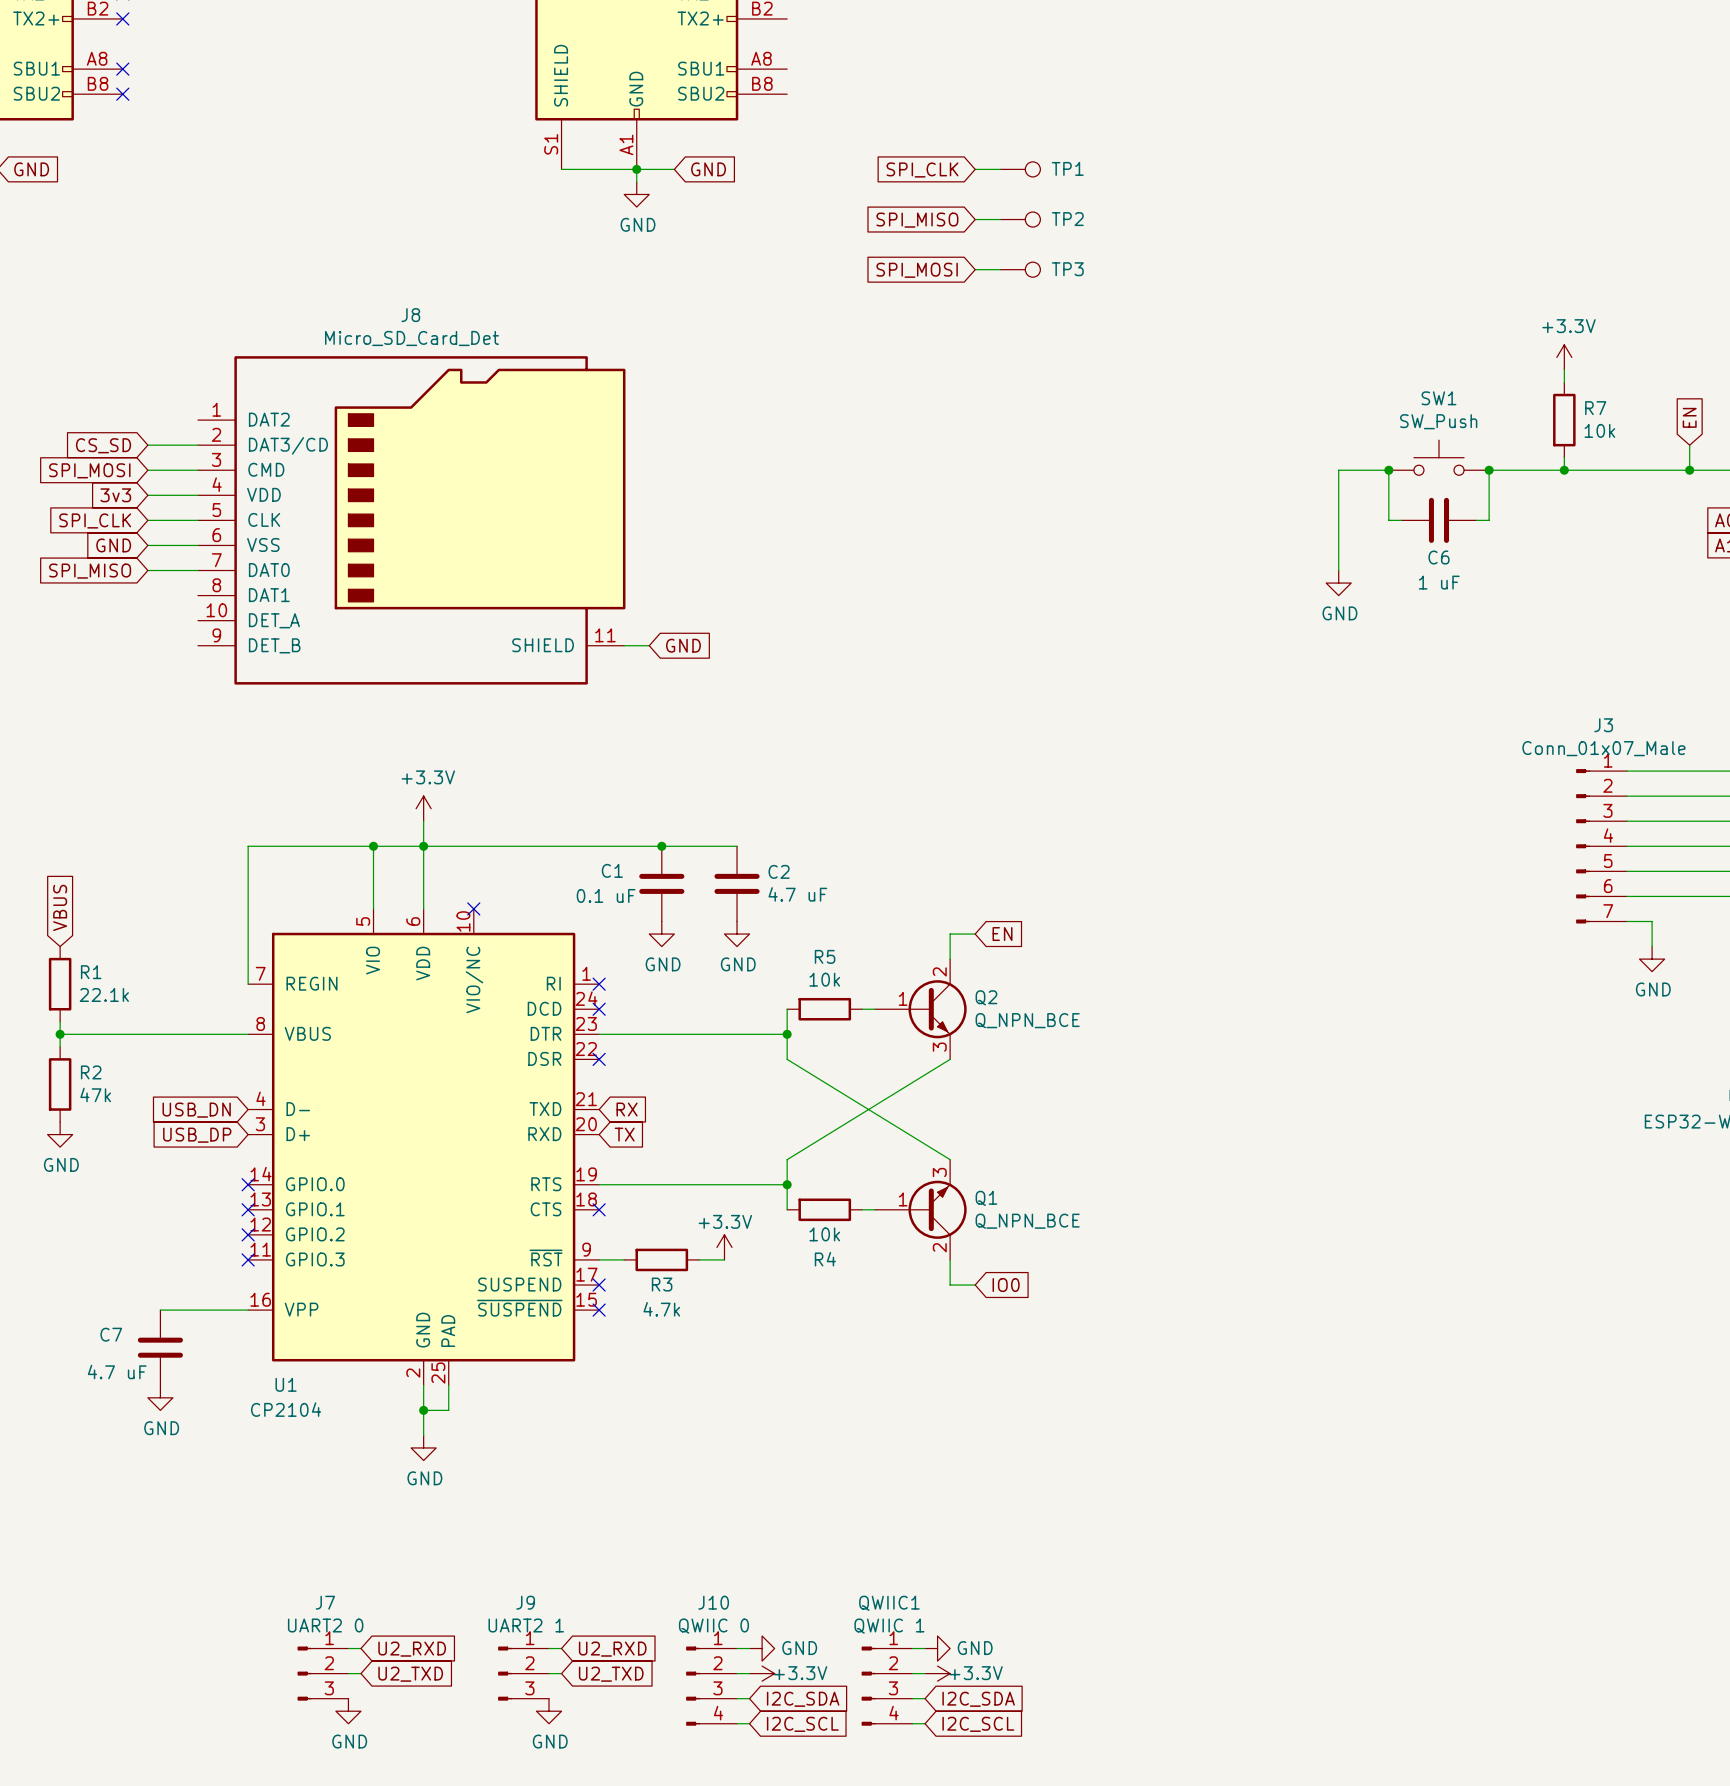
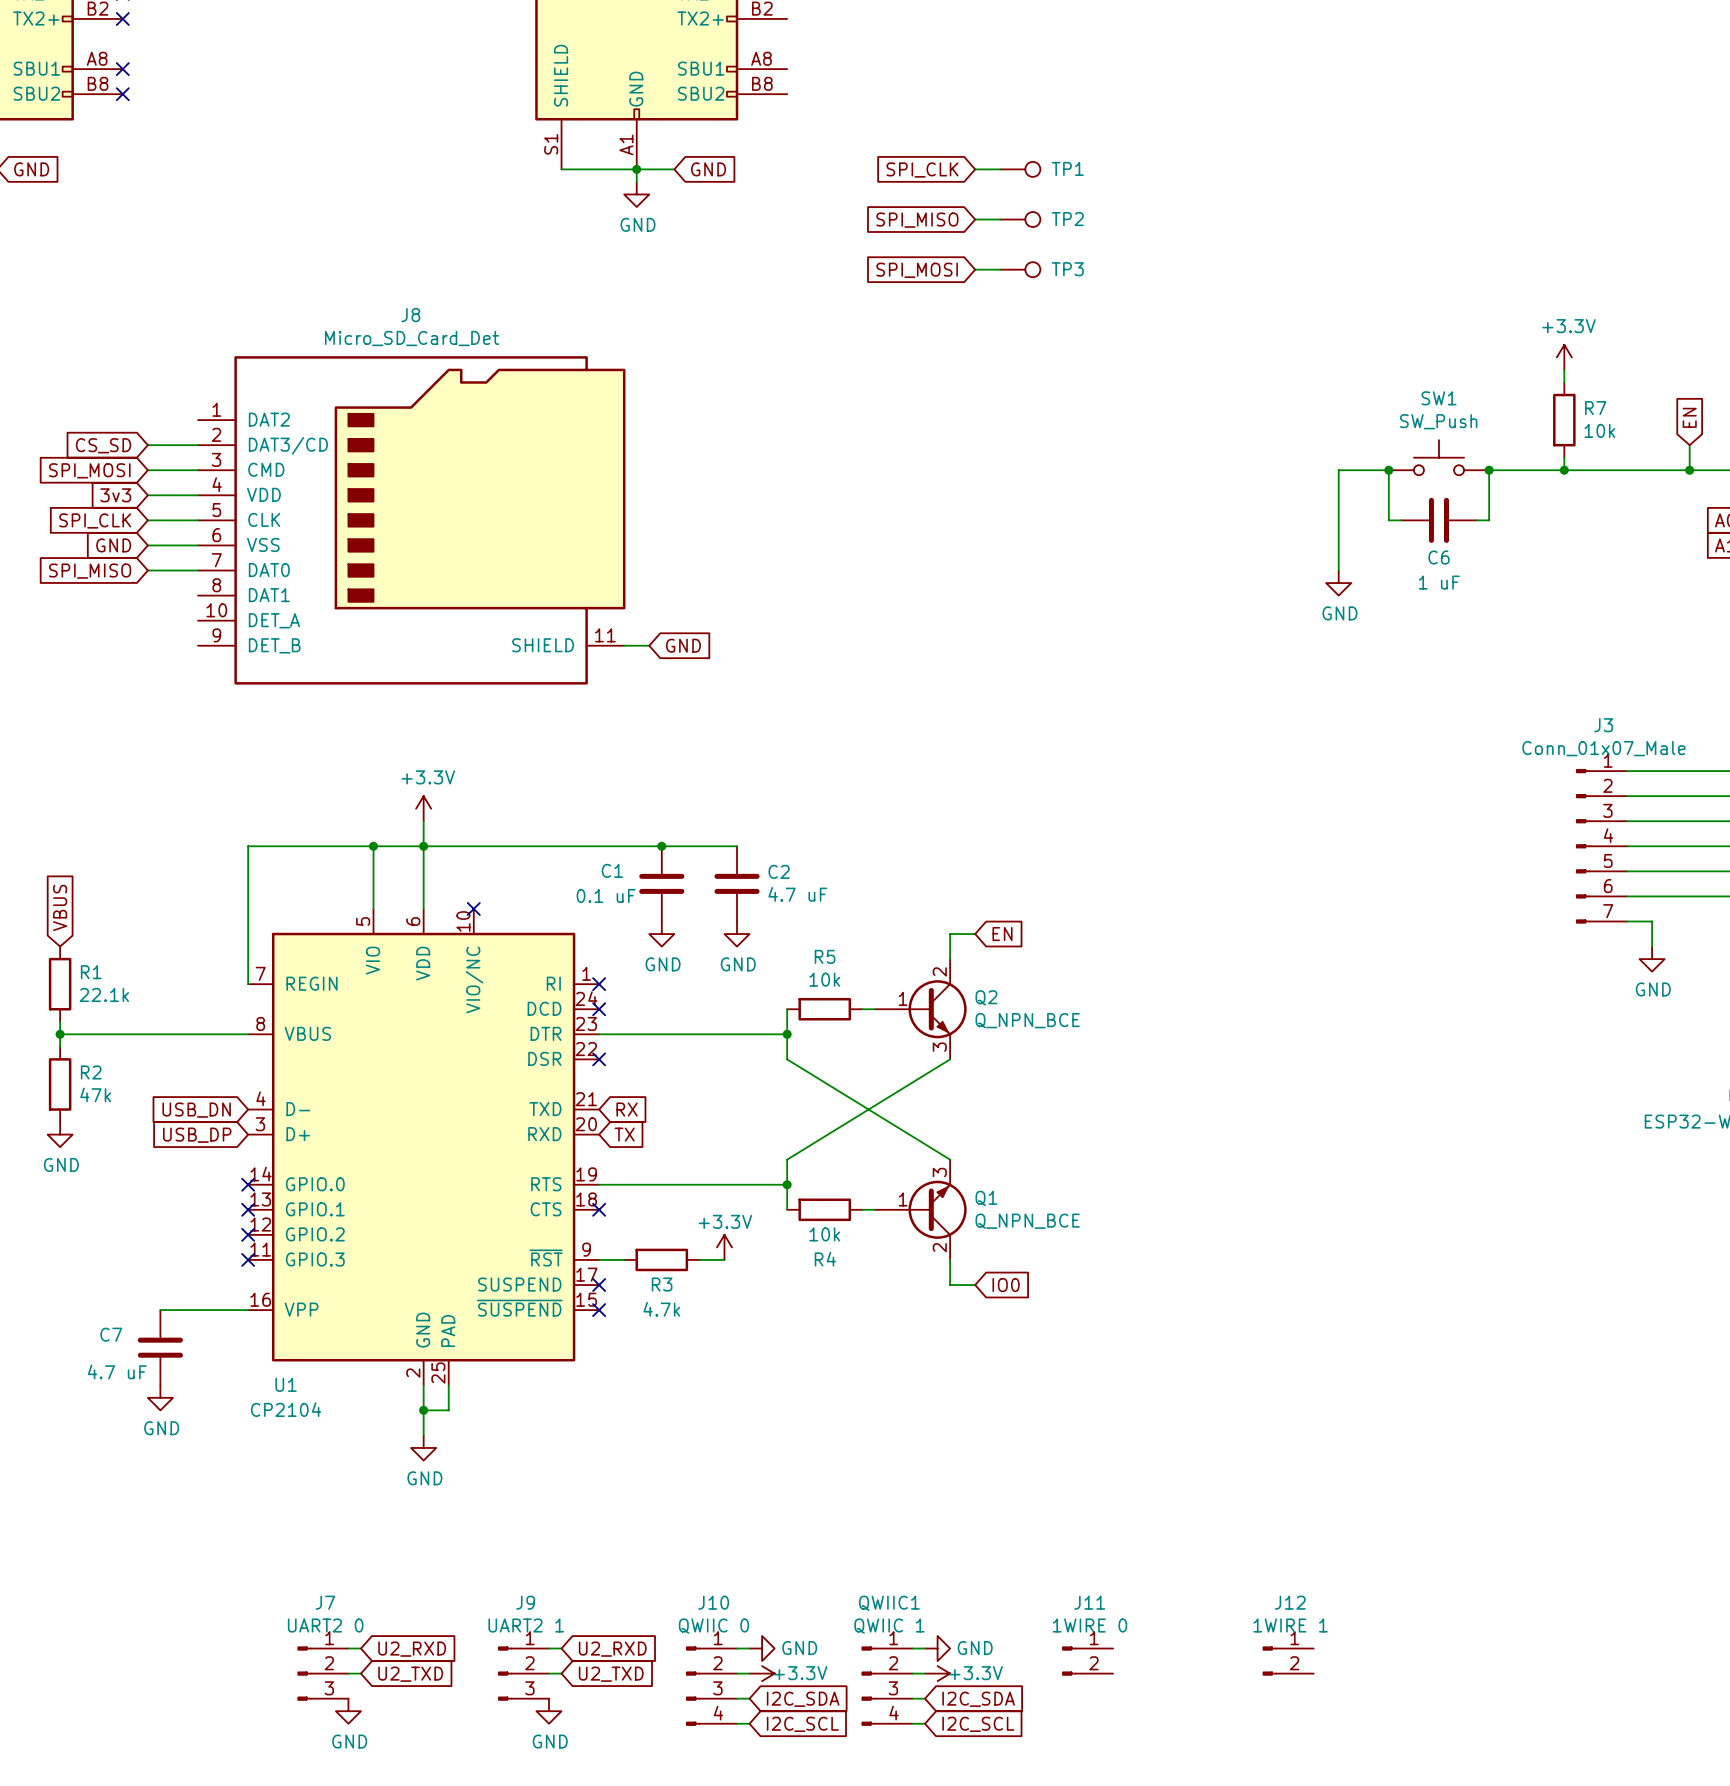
J11: none -> 1WIRE 0 (1087, 1661)
J12: none -> 1WIRE 1 (1288, 1661)

